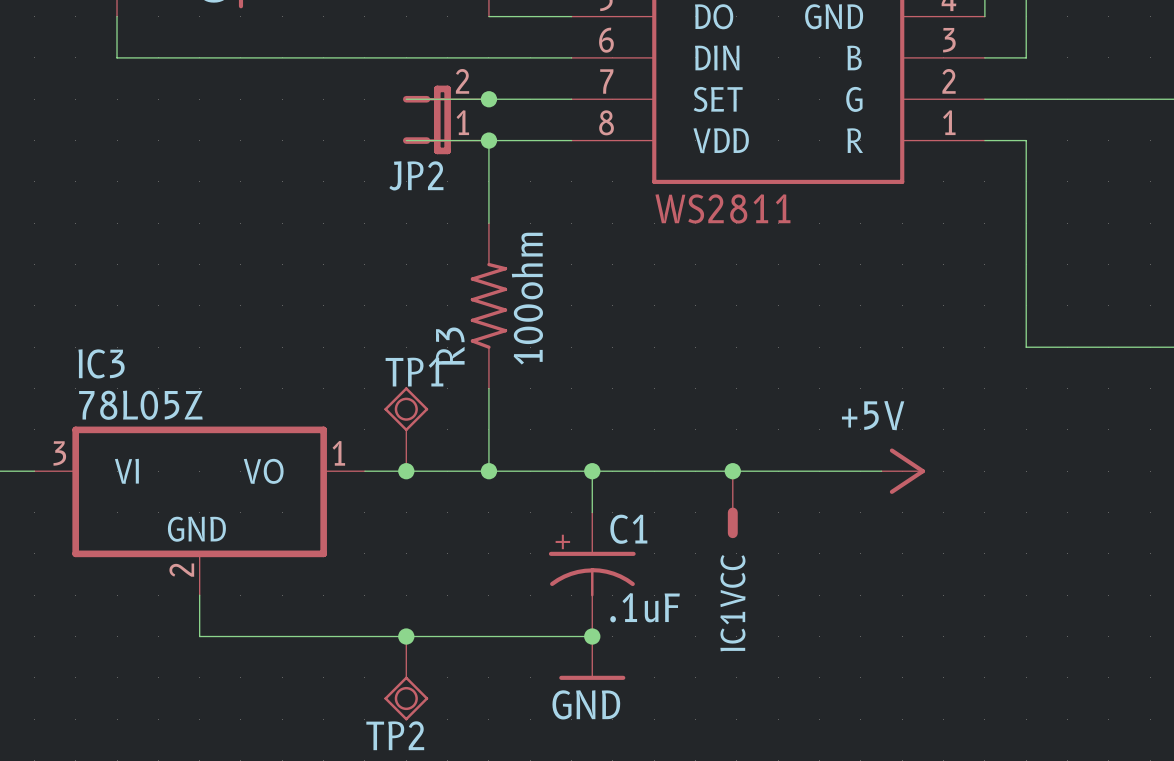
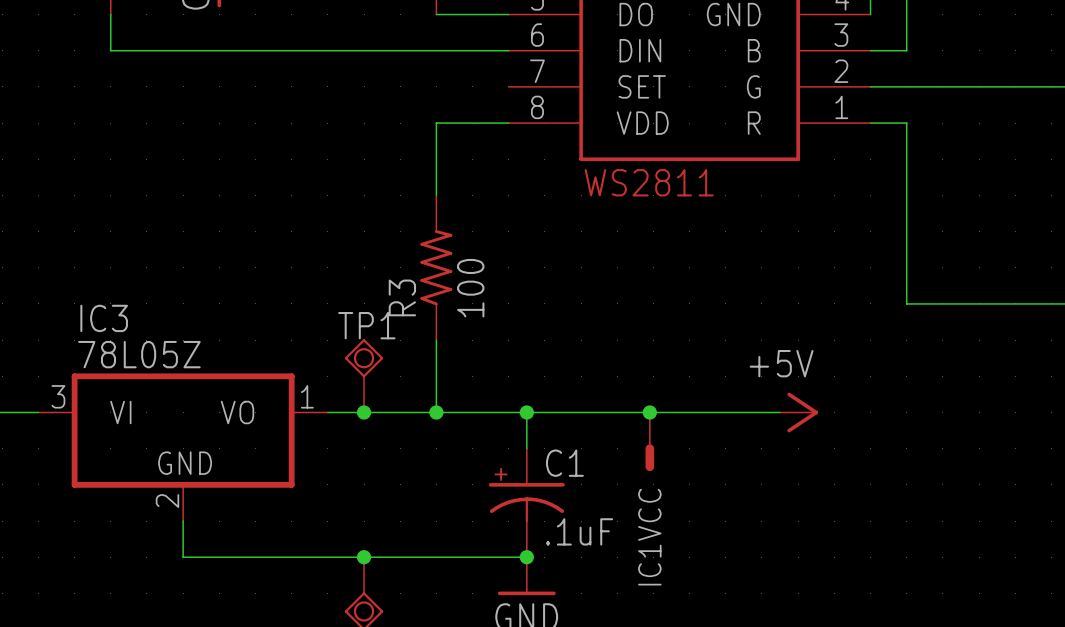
wire: (406, 99) (571, 99) -> none
junction: (488, 99) -> none
JP2: (445, 119) -> none
wire: (406, 140) (488, 140) -> none
junction: (488, 140) -> none
R3 value: 100ohm (527, 298) -> 100 (470, 288)

